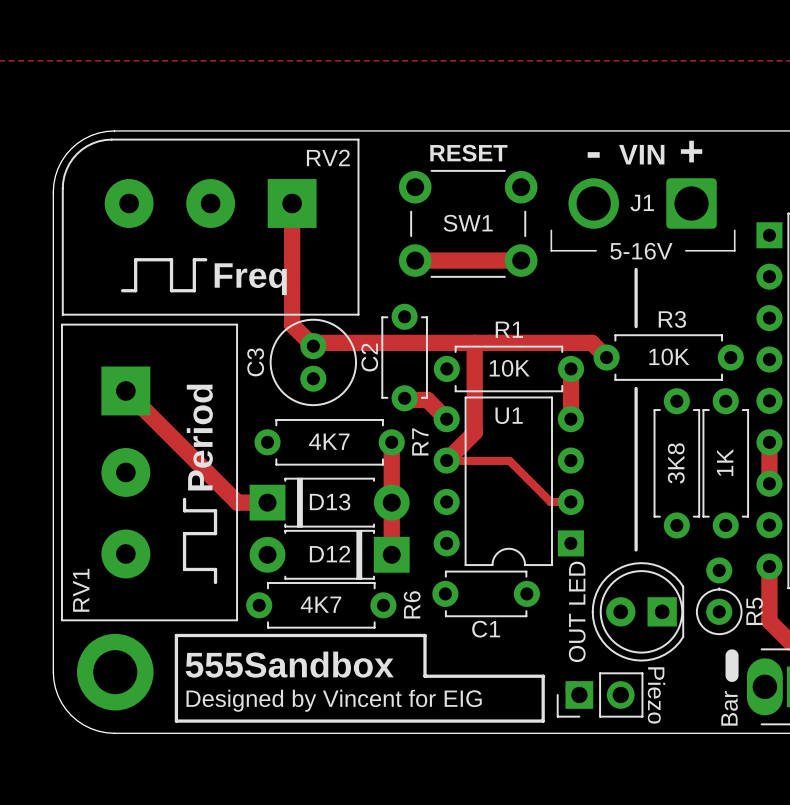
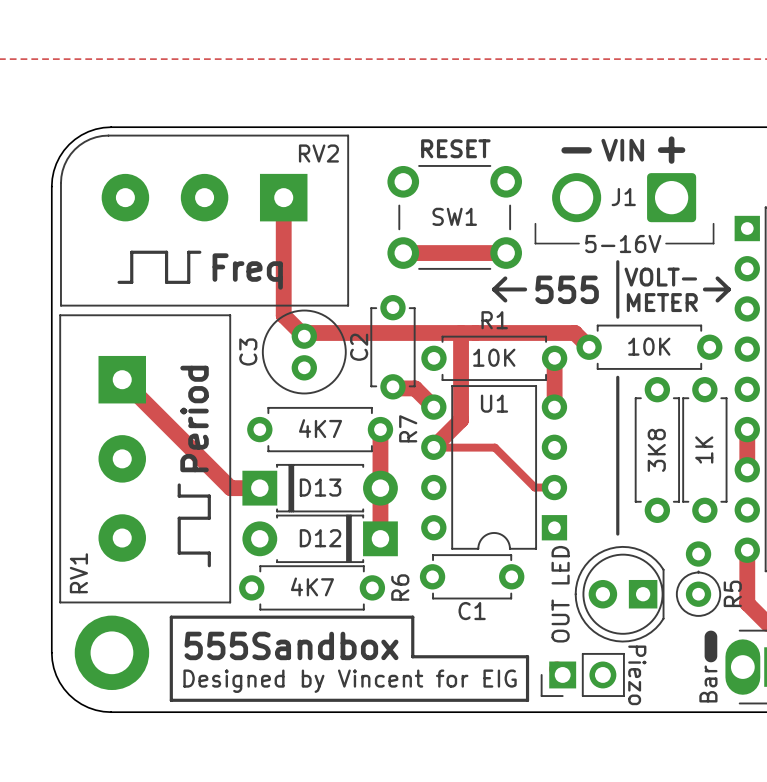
text: none -> VOLT- (660, 277)
line: none -> (505, 278) (493, 289)
line: none -> (717, 278) (729, 289)
line: none -> (493, 289) (525, 289)
line: none -> (493, 289) (505, 300)
text: none -> 555 (567, 289)
line: none -> (704, 289) (729, 289)
line: none -> (729, 289) (717, 300)
text: none -> METER (662, 302)
R3 name: R3 (672, 319) -> none

